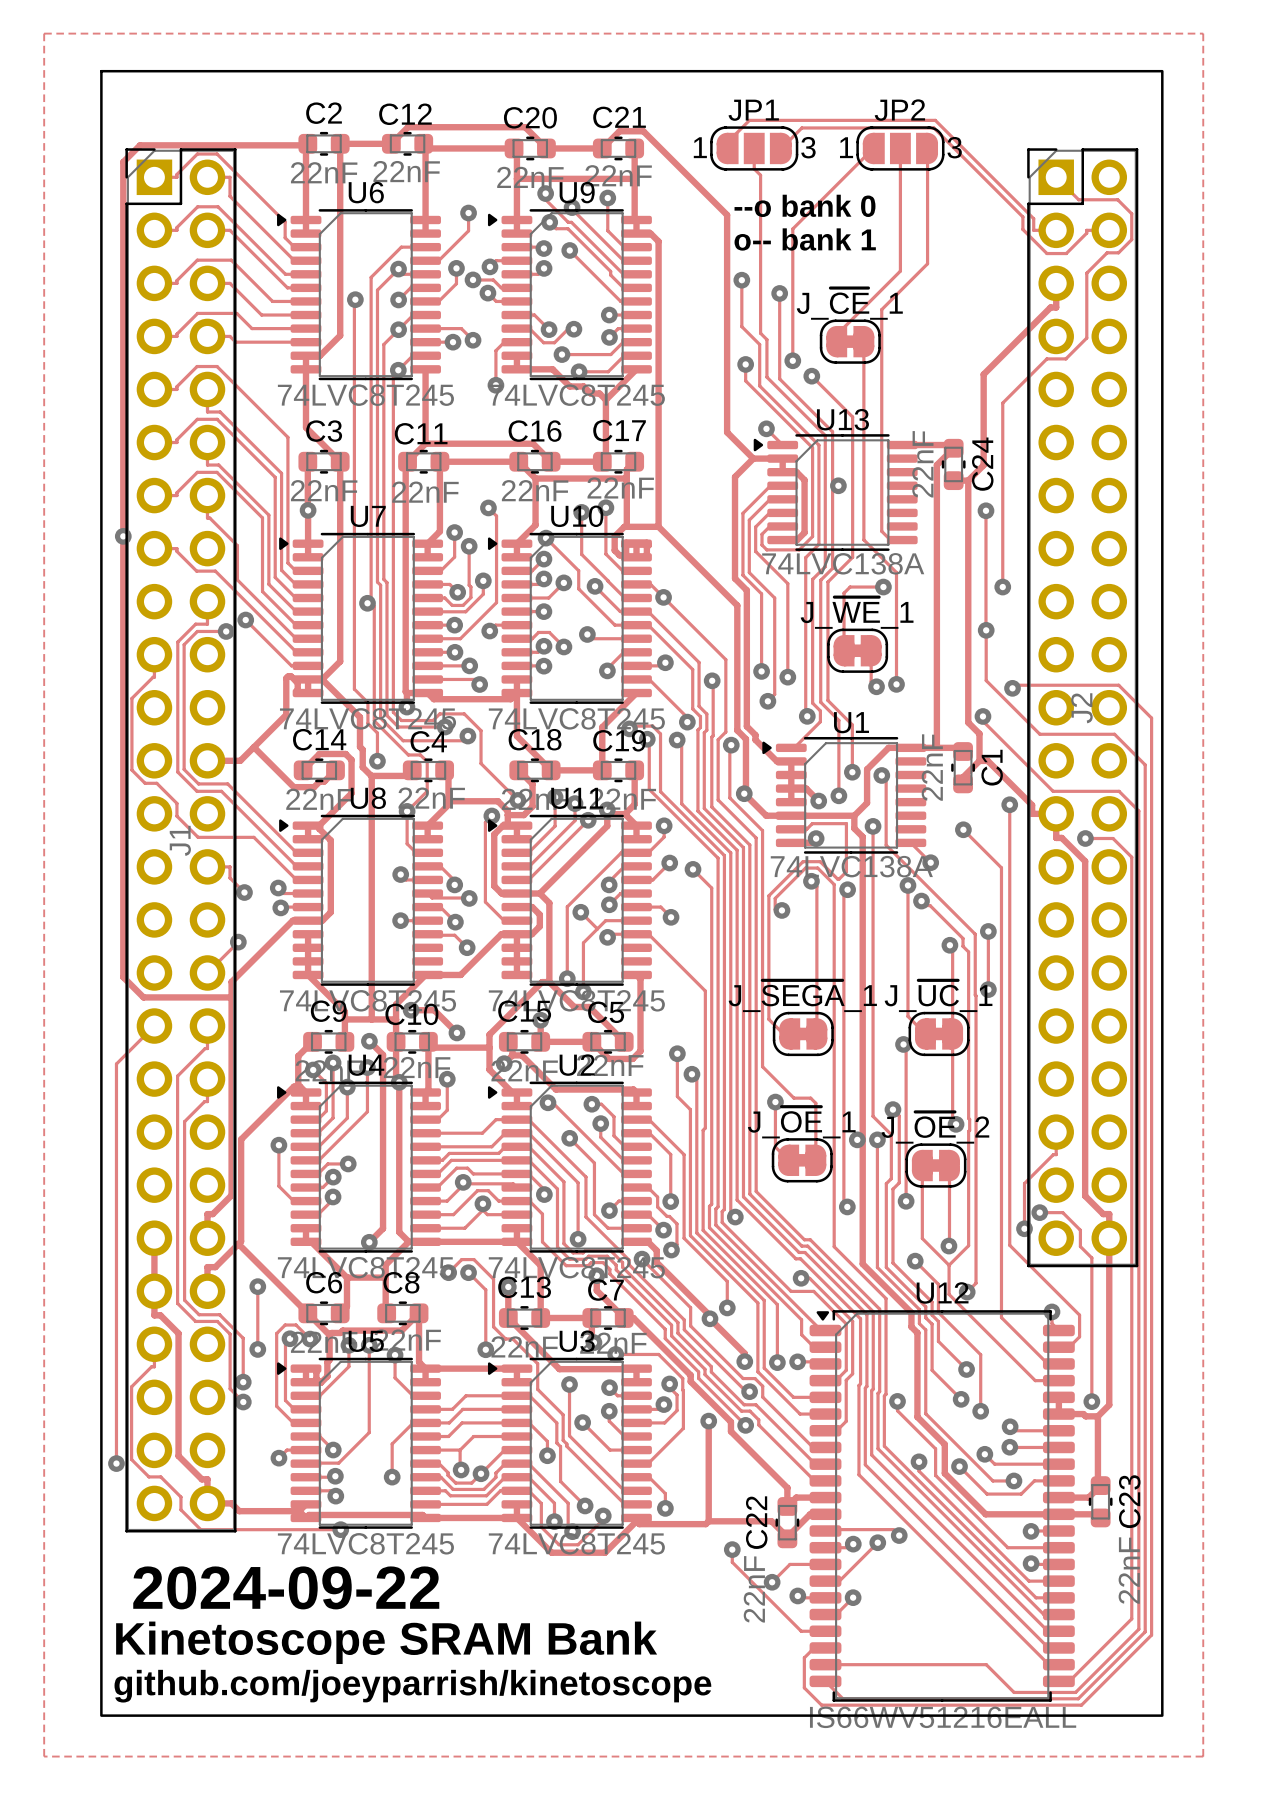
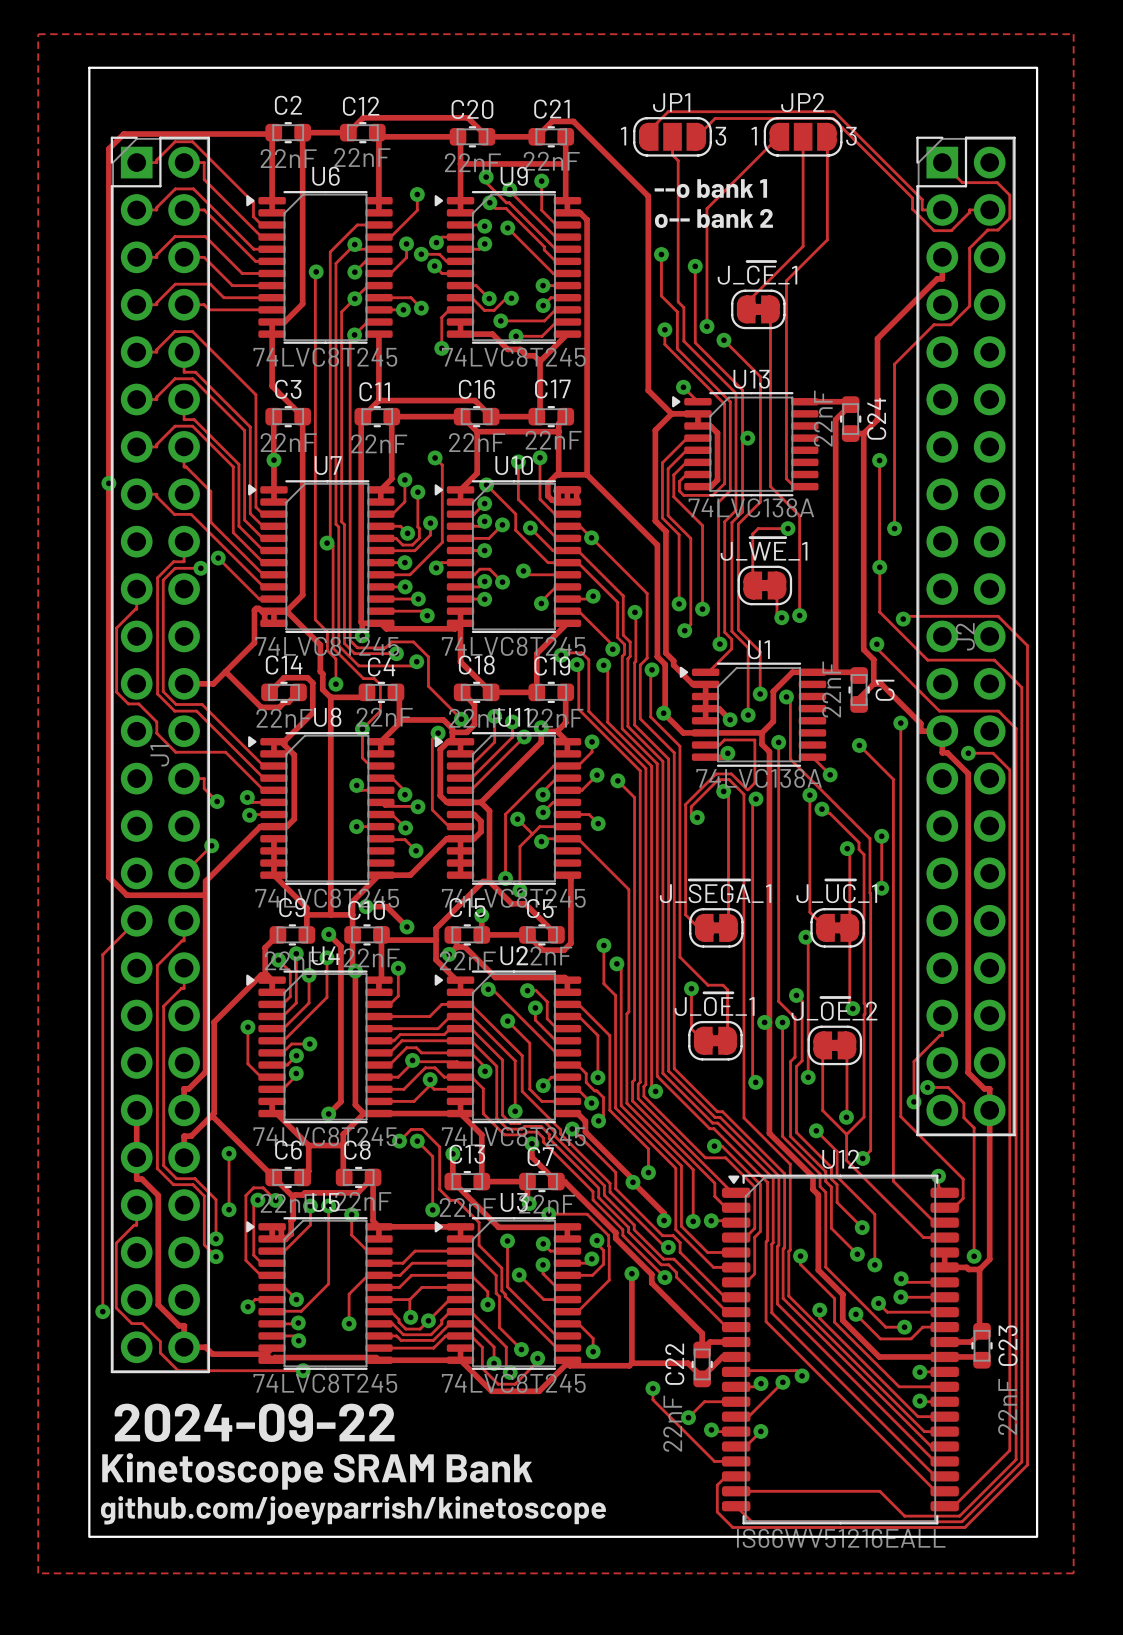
text: --o bank 0 (805, 205) -> --o bank 1 (710, 188)
text: o-- bank 1 (805, 239) -> o-- bank 2 (713, 218)

